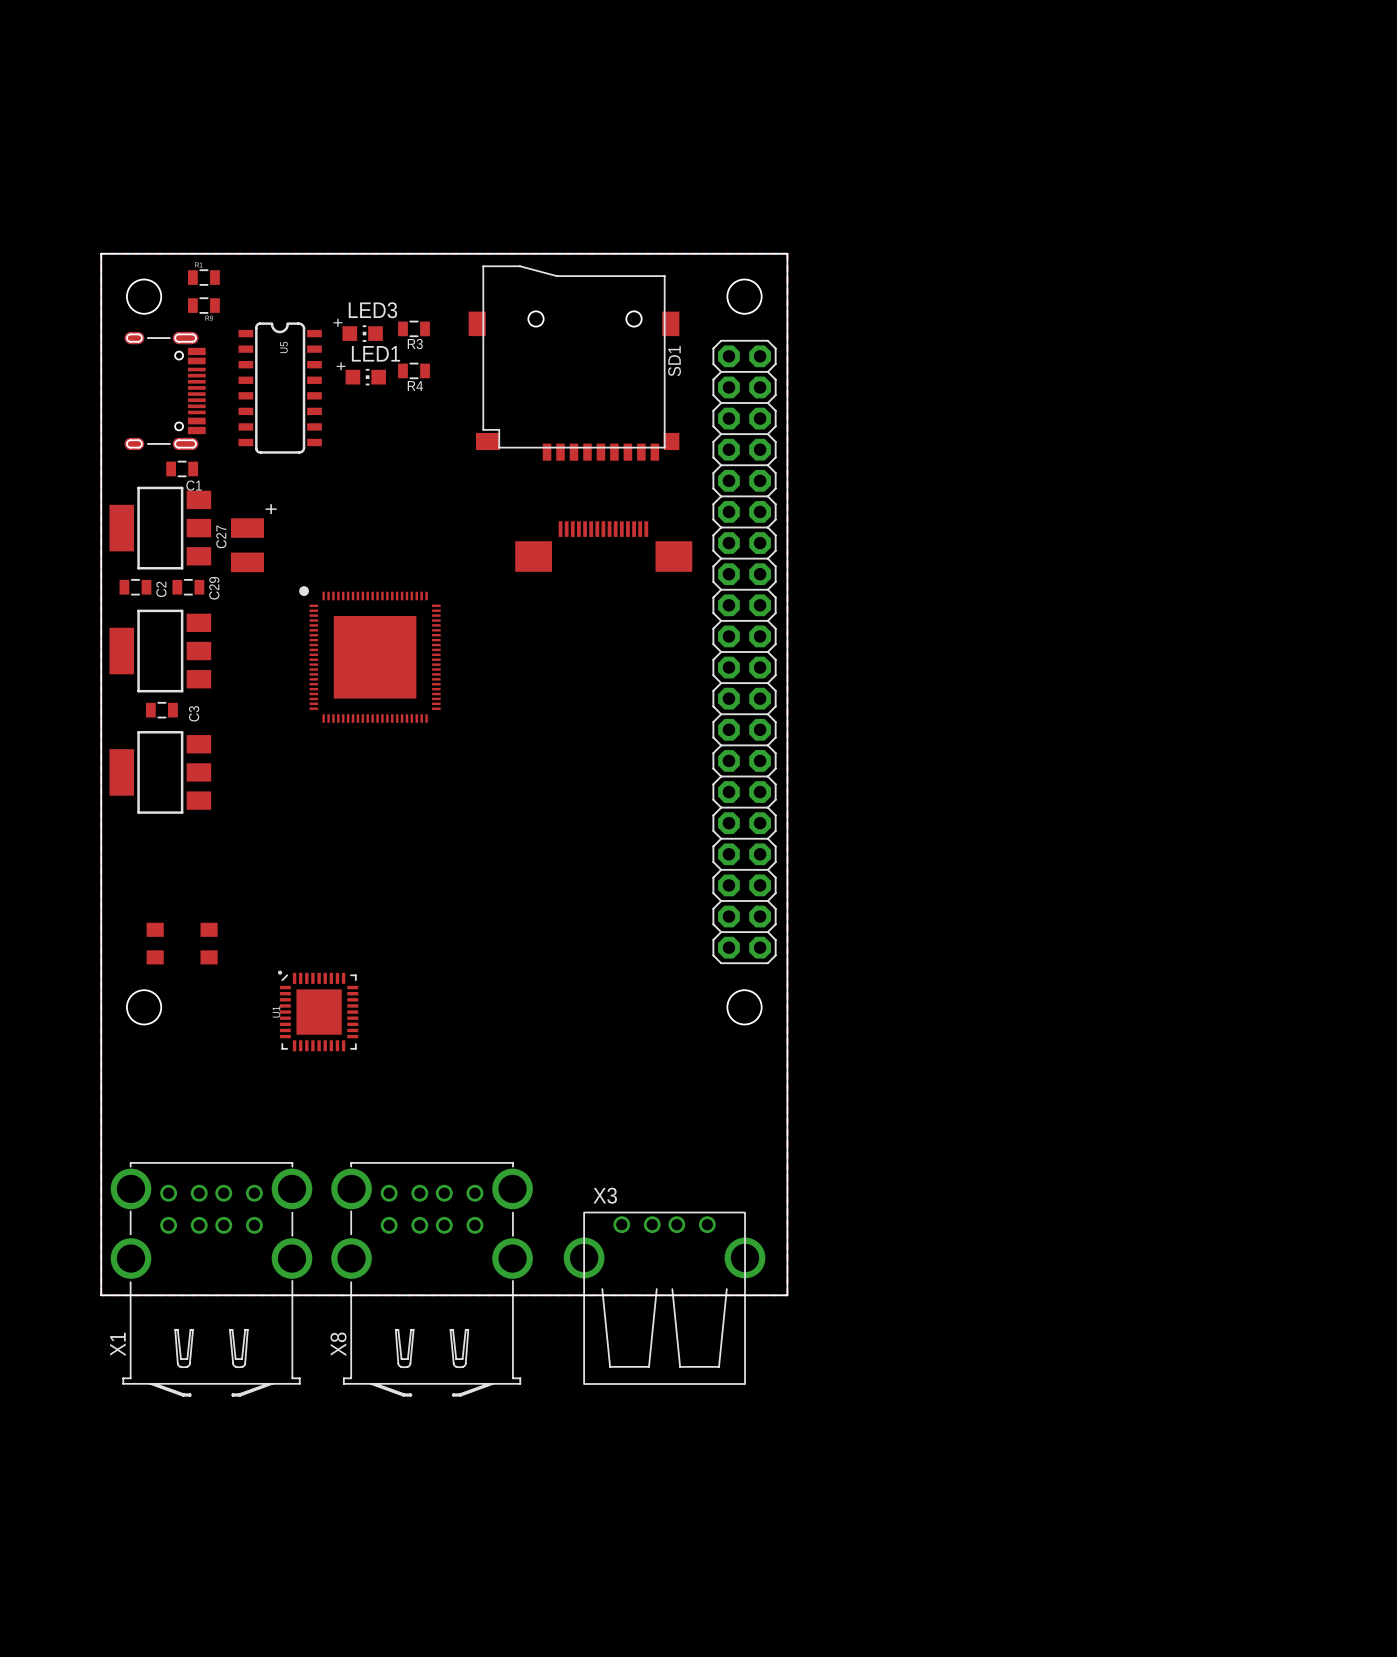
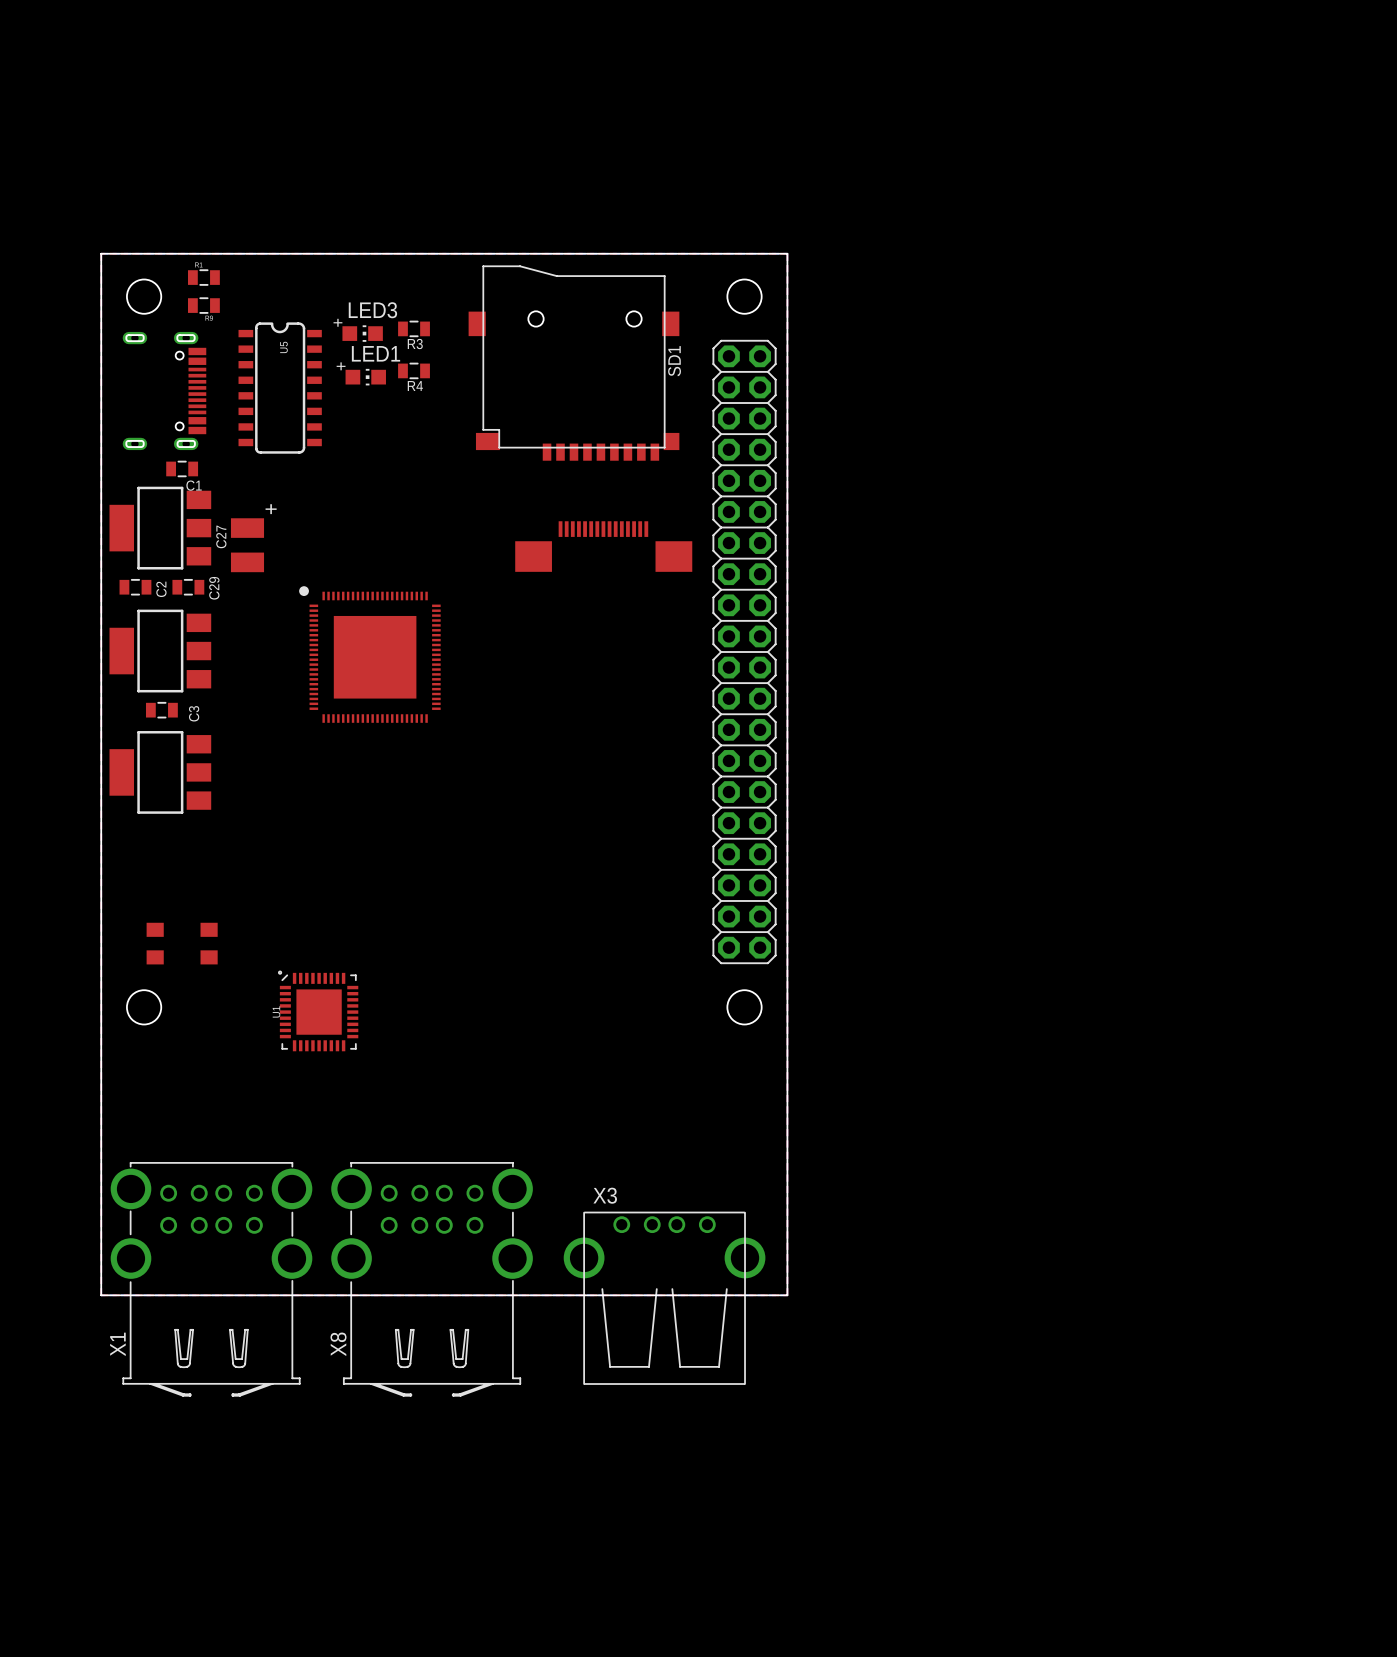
part footprint: [124, 331, 206, 451] -> [122, 331, 207, 451]

